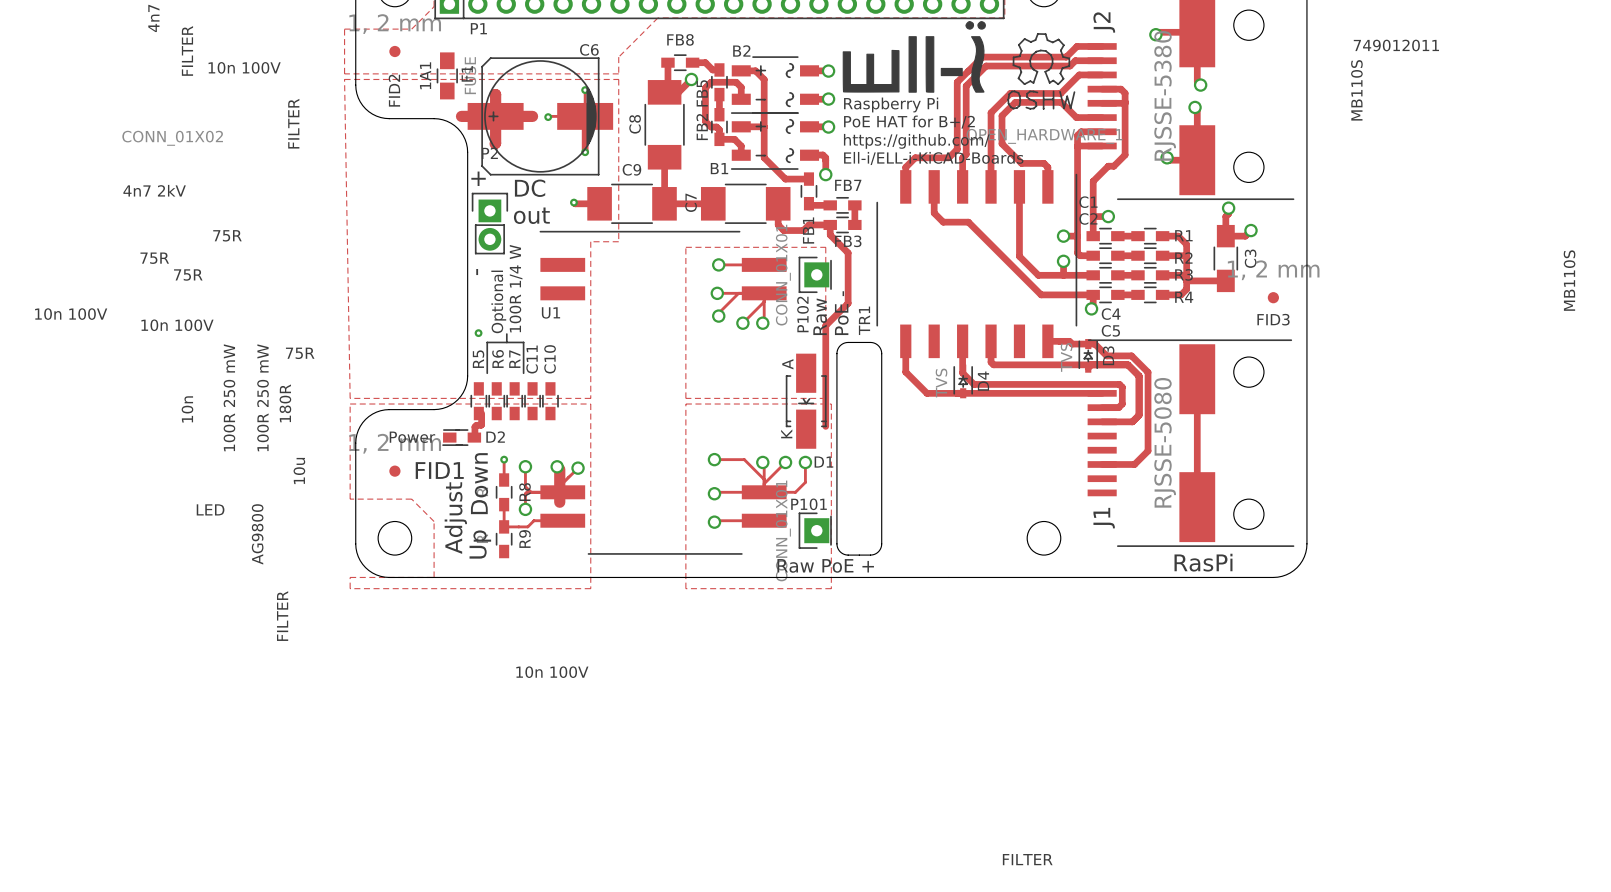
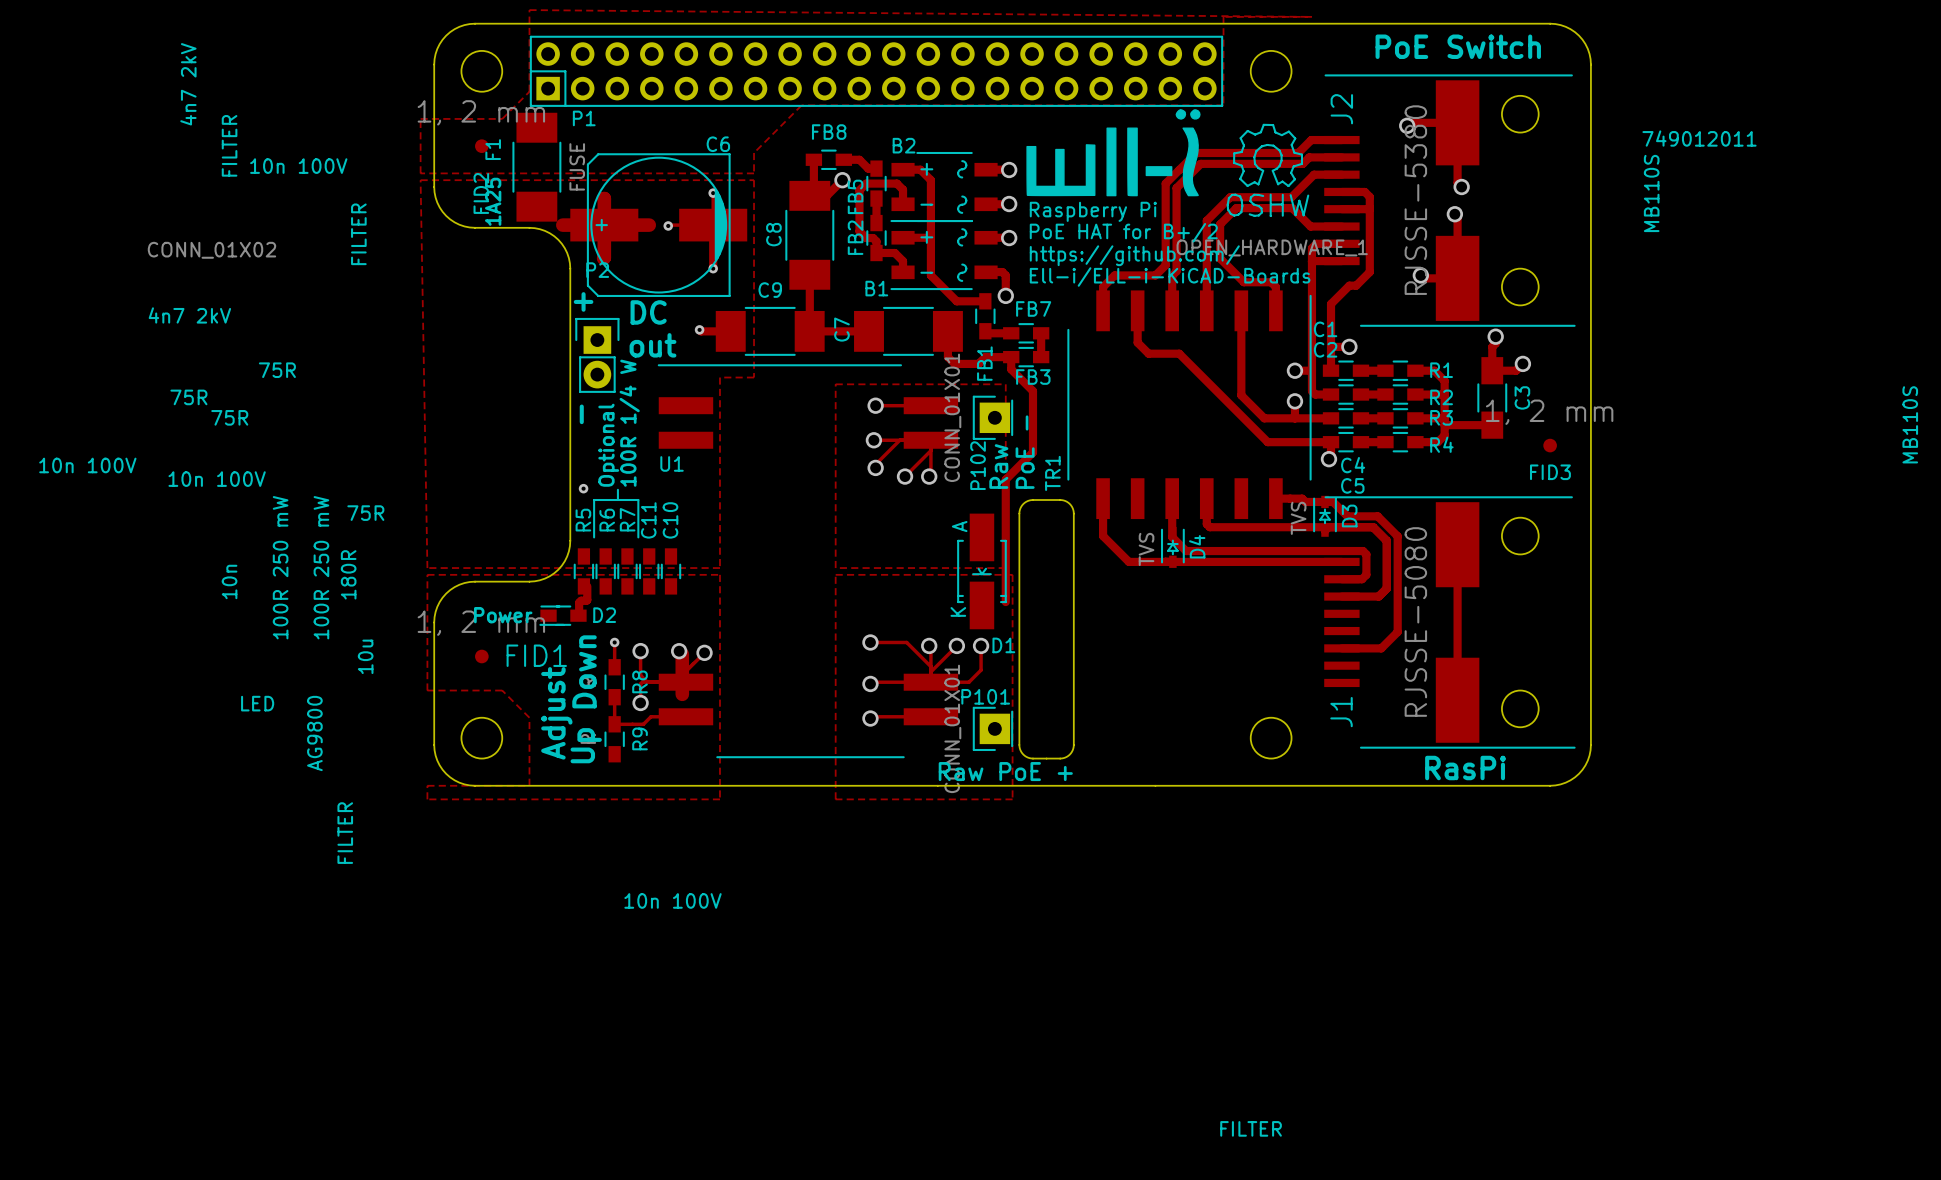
F1 footprint: [436, 52, 458, 100] -> [512, 112, 562, 222]
F1 name position: F1 (467, 73) -> F1 (493, 149)
text: 1A1 (425, 75) -> none
text: none -> 1A25 (493, 201)

